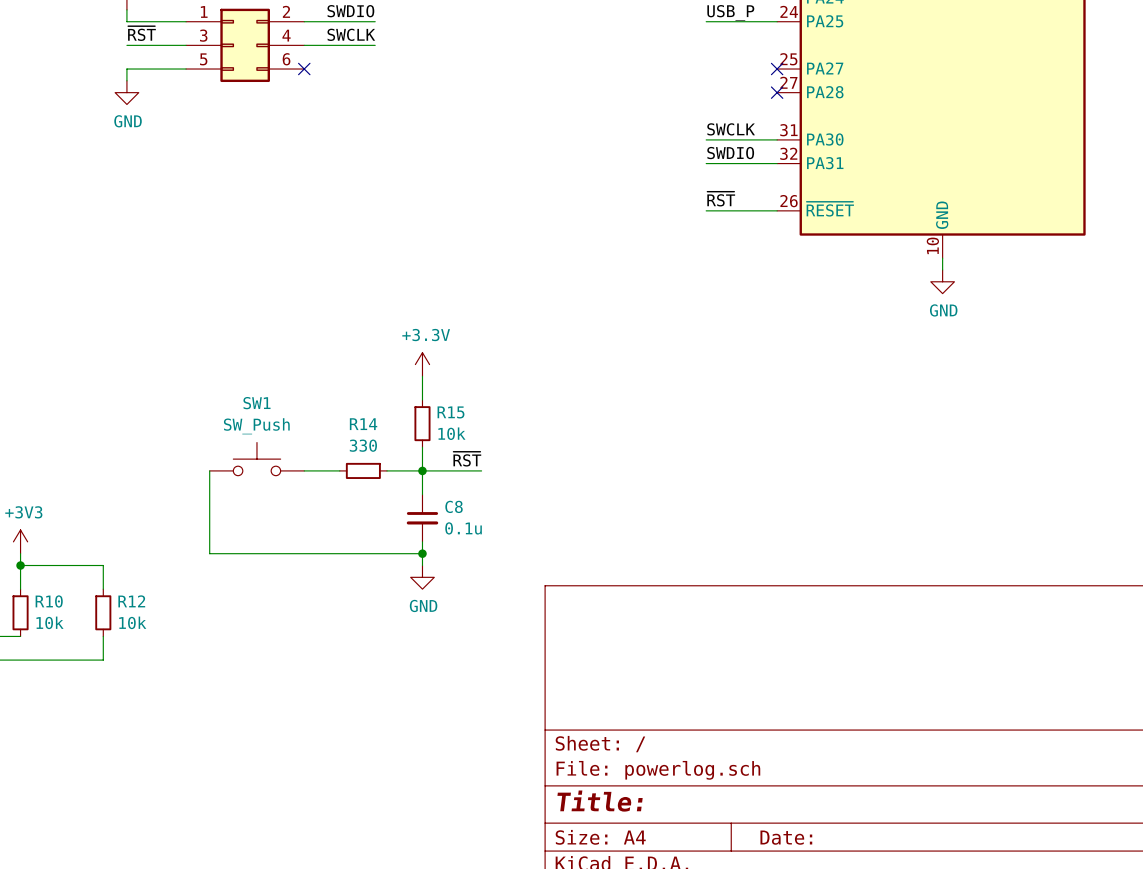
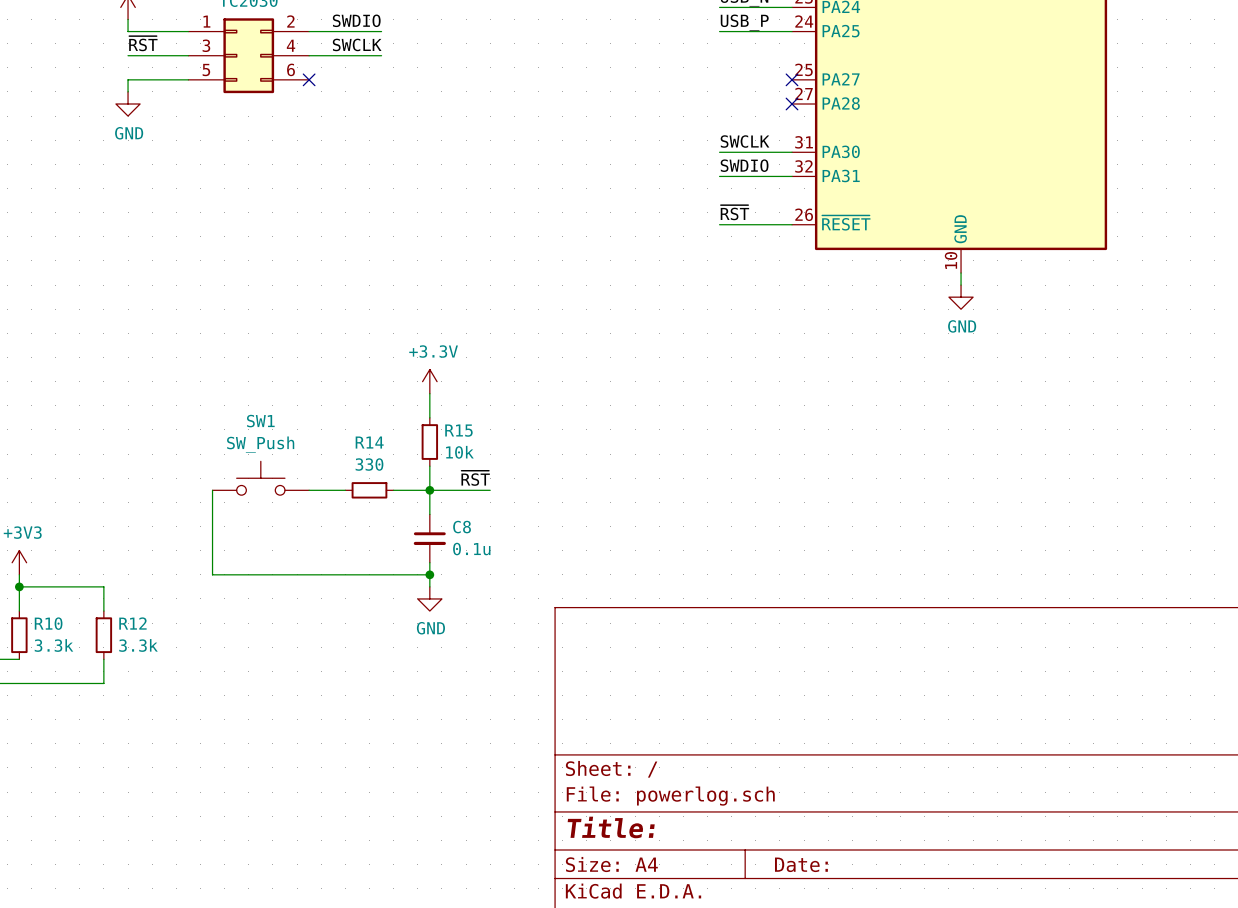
R10 value: 10k (50, 622) -> 3.3k (53, 645)
R12 value: 10k (132, 622) -> 3.3k (138, 645)

